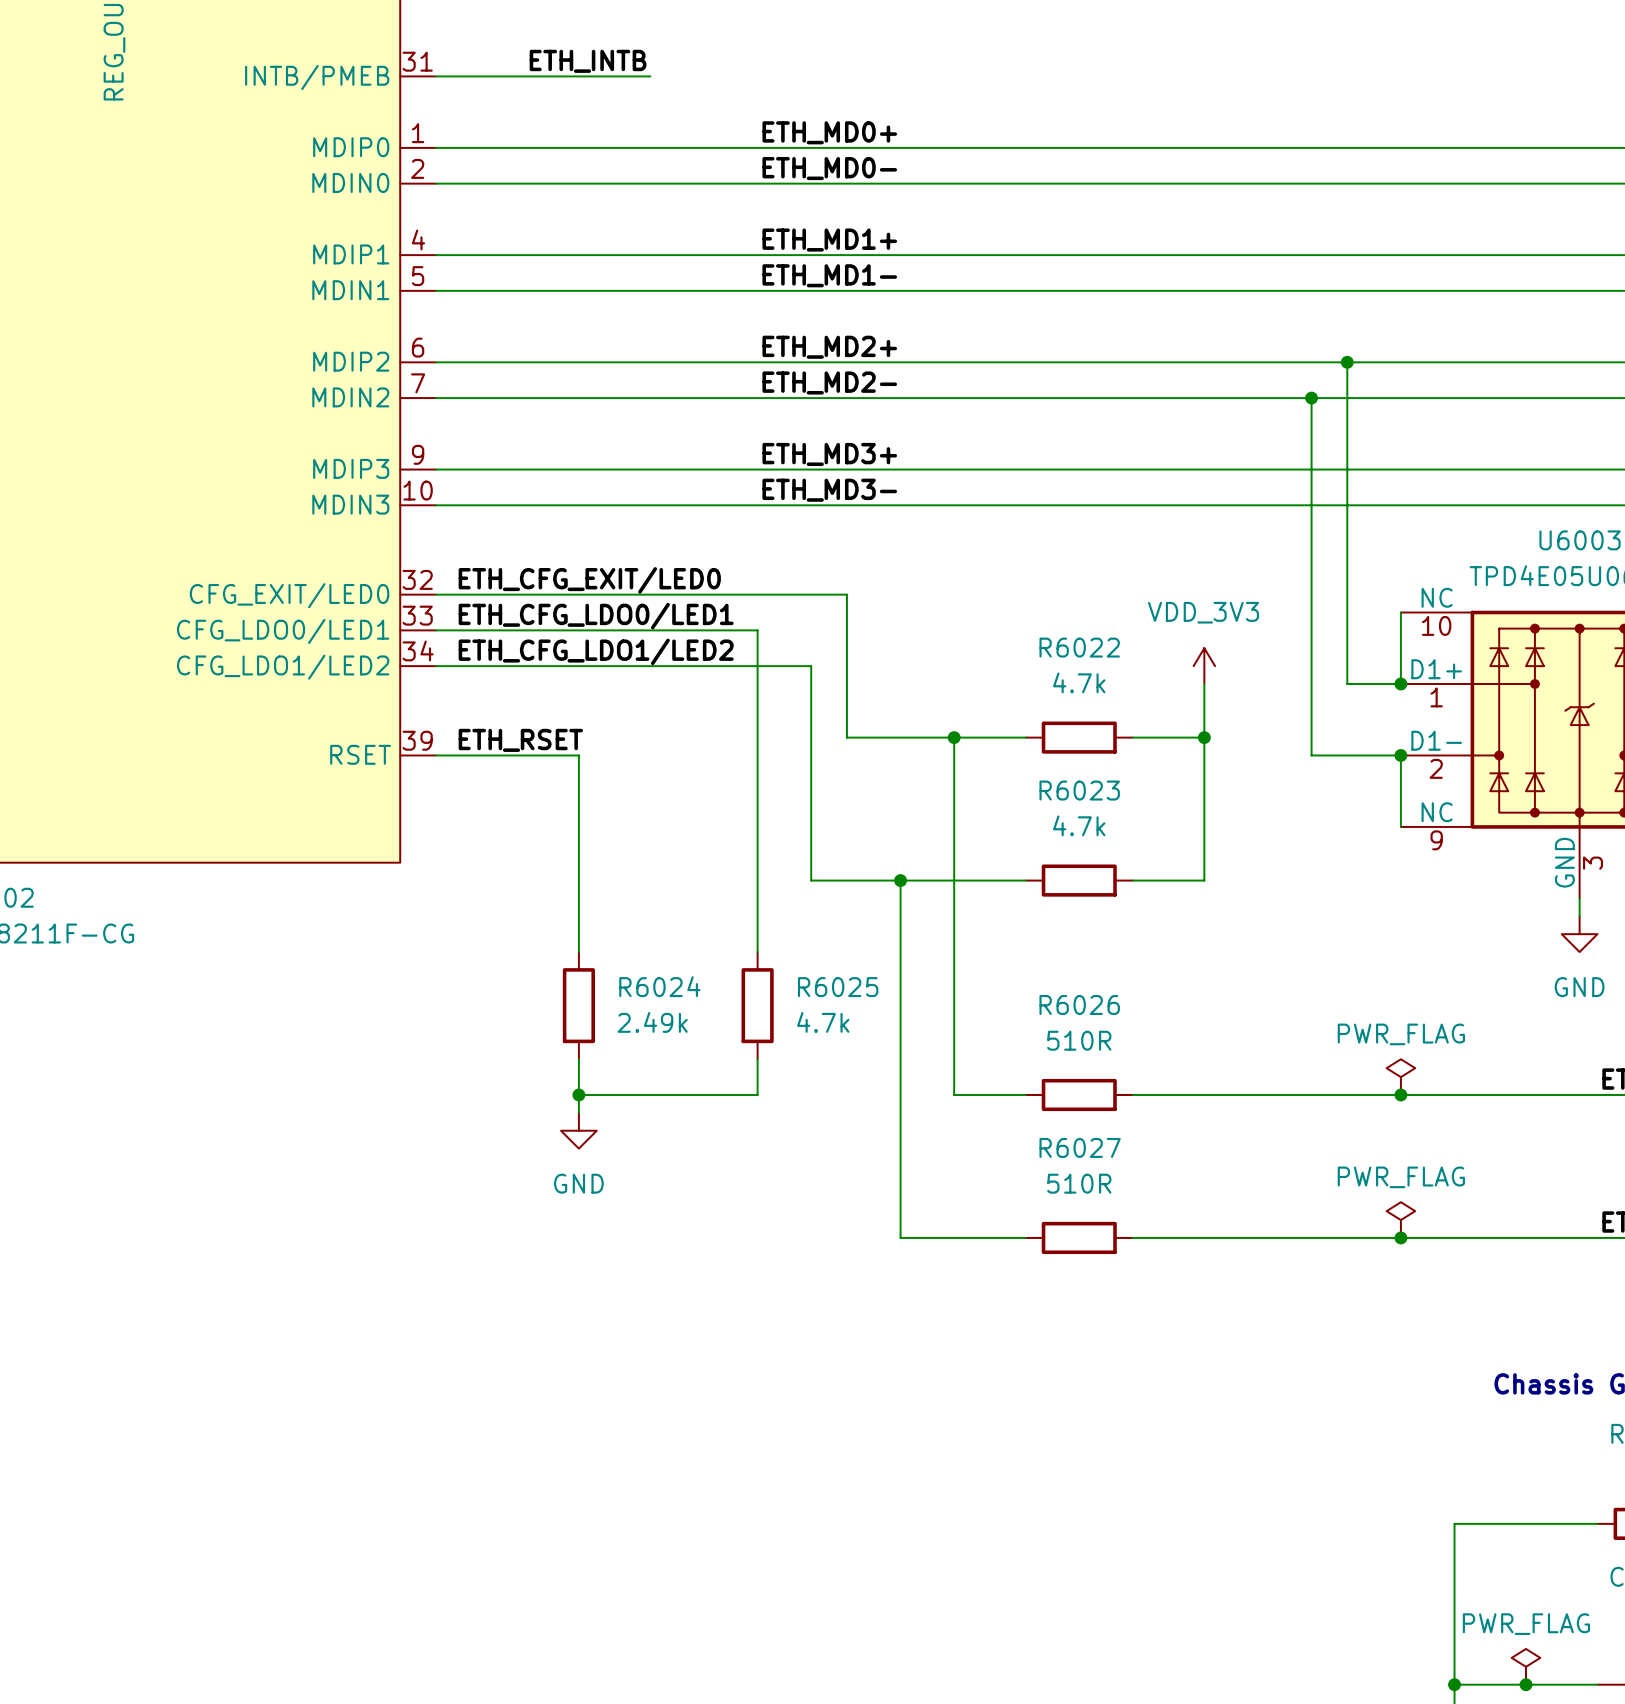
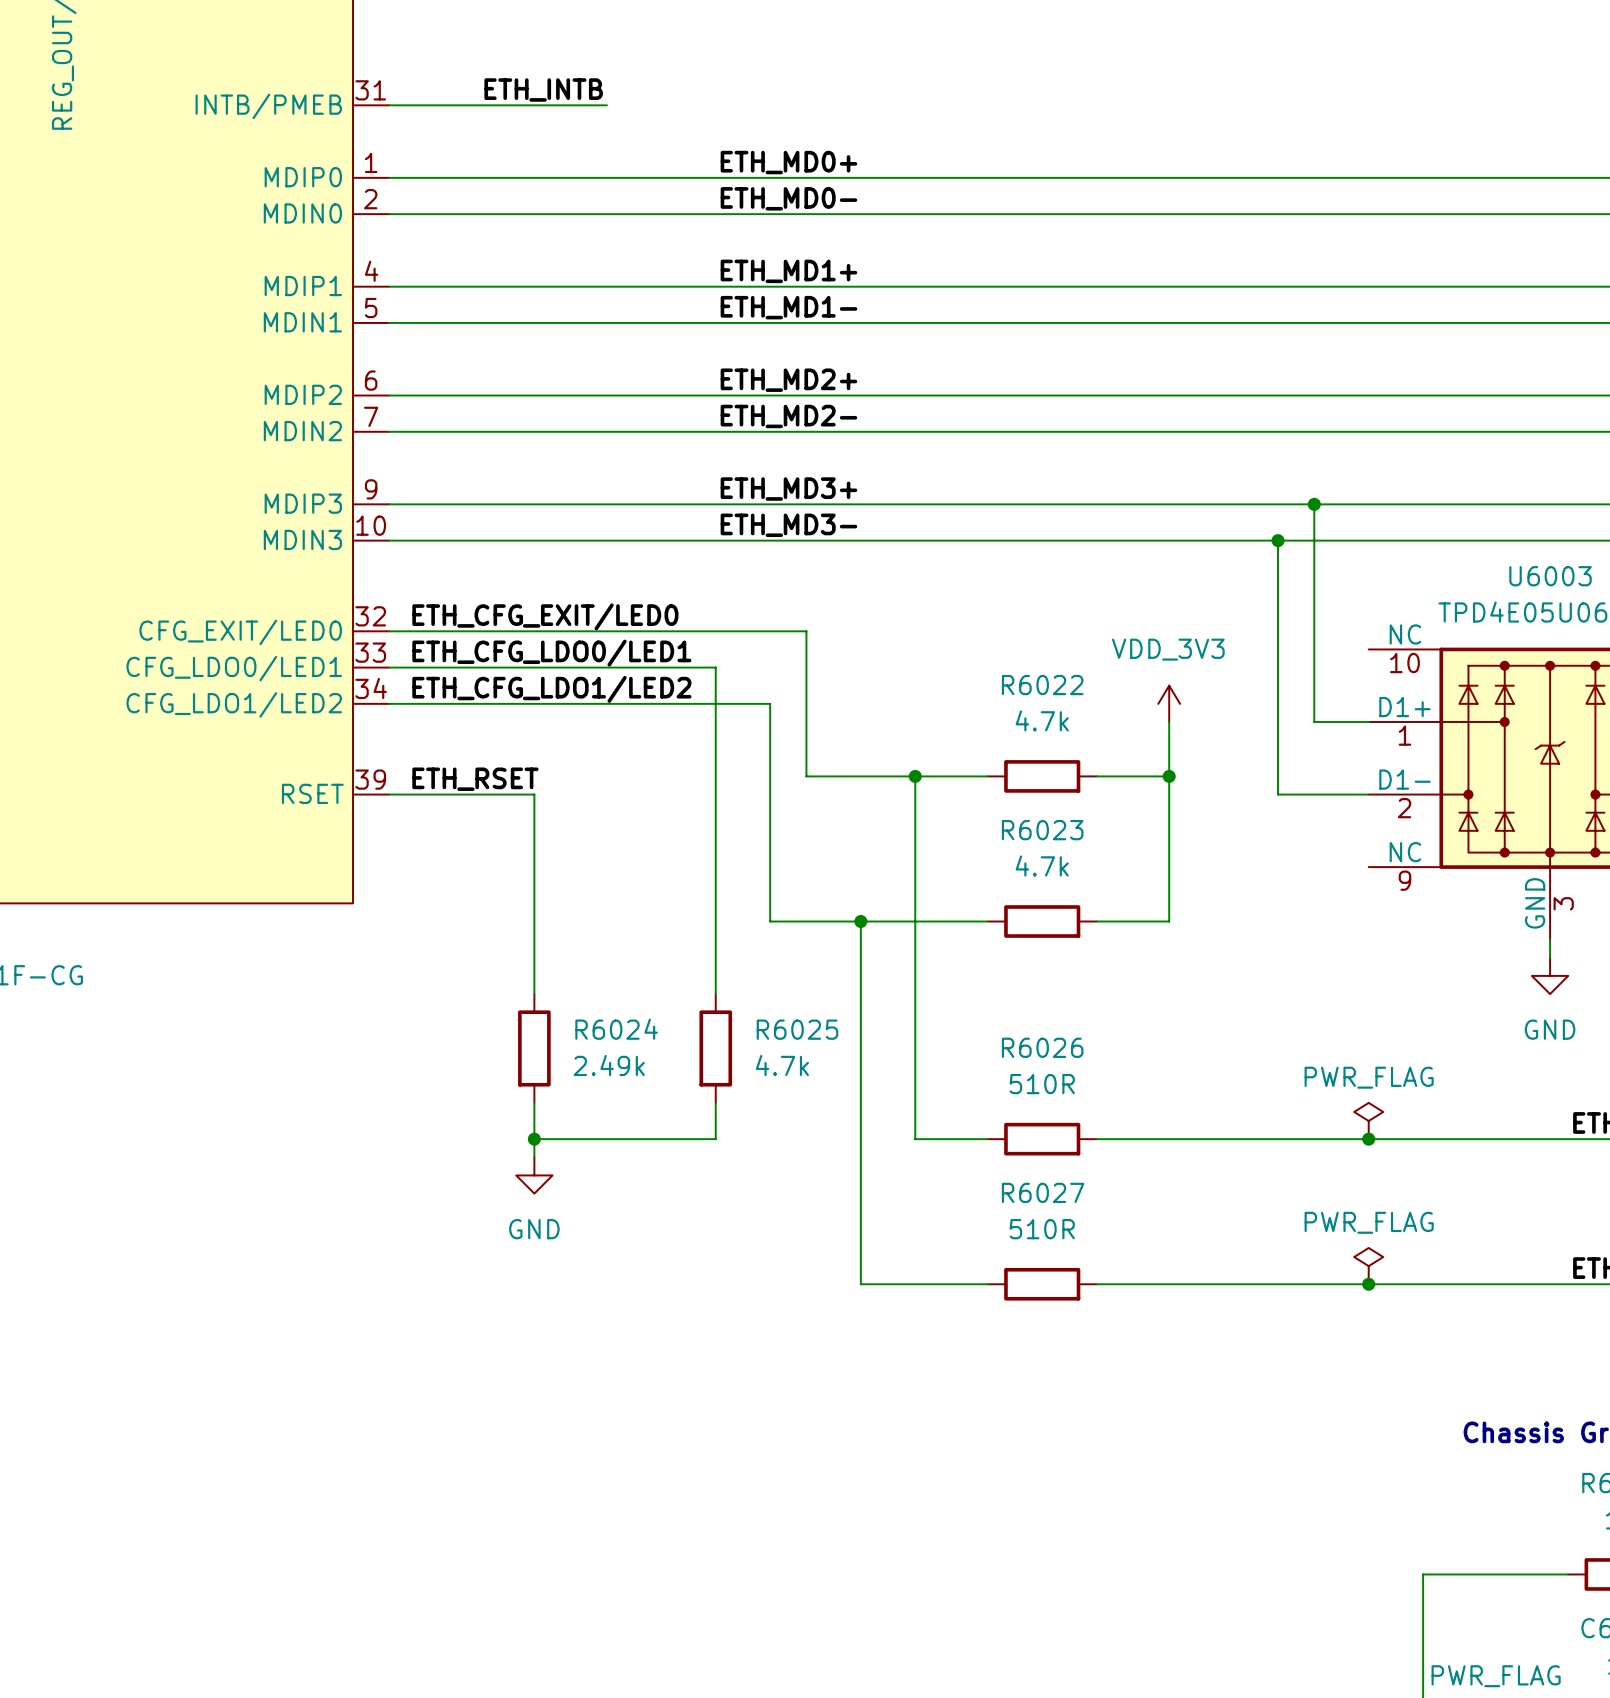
wire: (1347, 362) (1347, 469) -> none
junction: (1347, 362) -> none
wire: (1311, 398) (1311, 505) -> none
junction: (1311, 398) -> none
junction: none -> (1314, 504)
junction: none -> (1278, 540)
wire: (1400, 612) (1400, 683) -> none
junction: (1400, 683) -> none
wire: (1400, 755) (1400, 826) -> none
junction: (1400, 755) -> none

